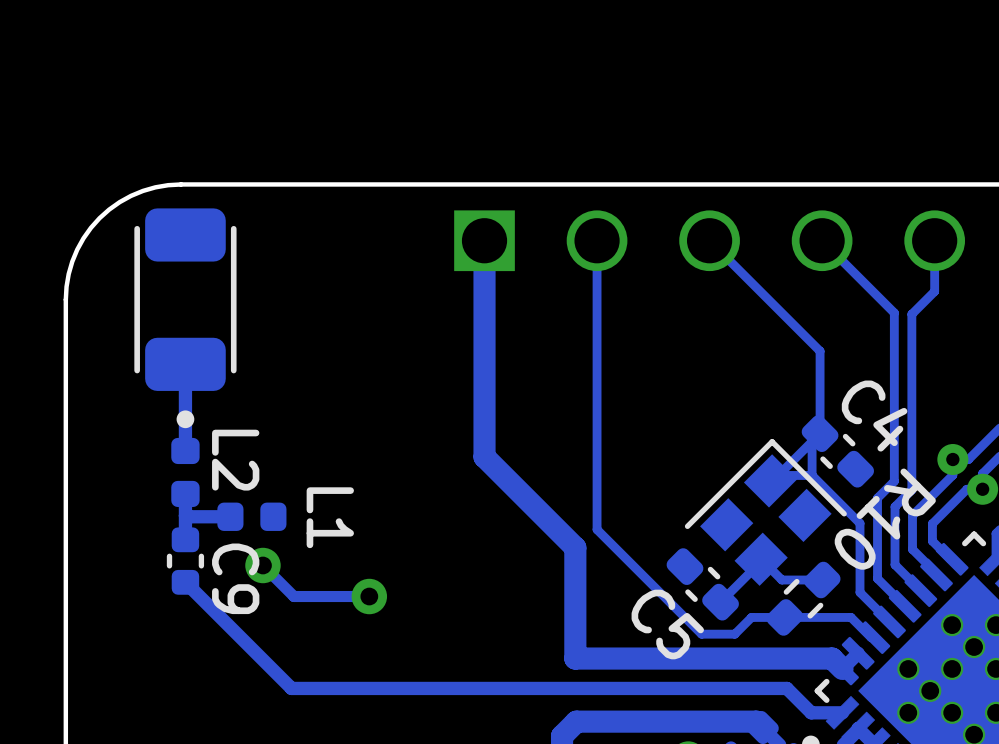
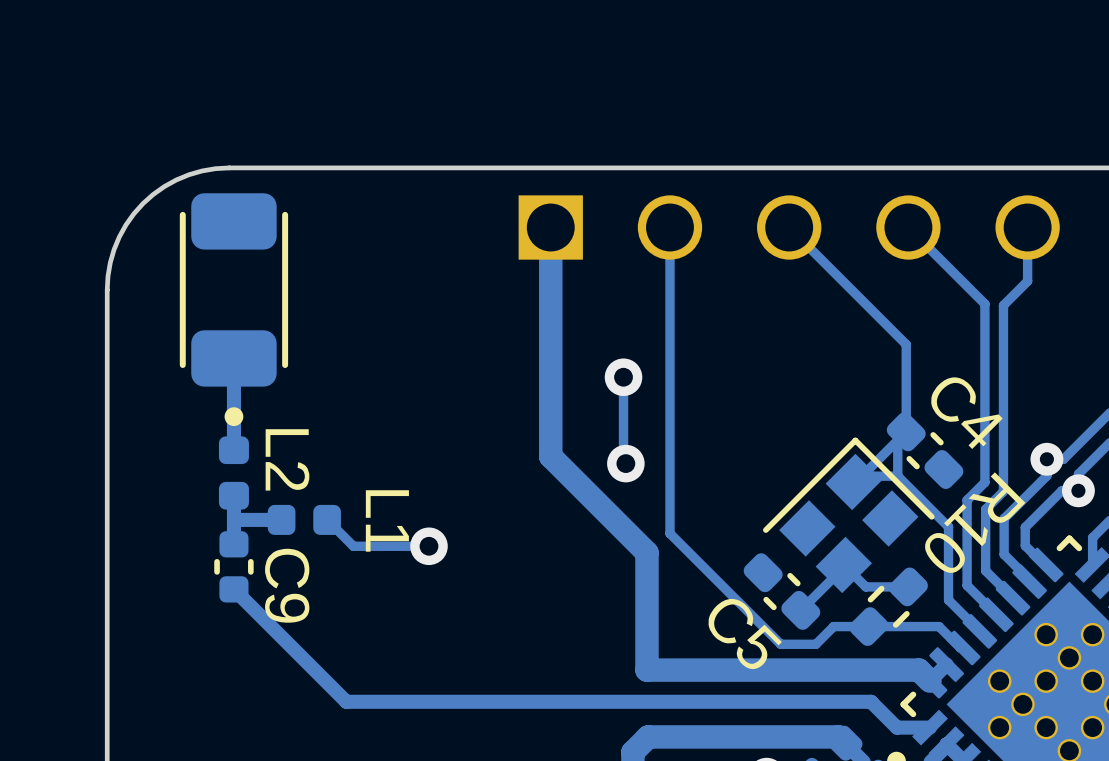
track: none -> (623, 377) (623, 461) (625, 463)
via: none -> (623, 377)
via: none -> (625, 463)
track: none -> (327, 519) (353, 546) (428, 546)
via: none -> (428, 546)
track: (262, 565) (294, 596) (369, 596) -> none
via: (262, 565) -> none
via: (369, 596) -> none

